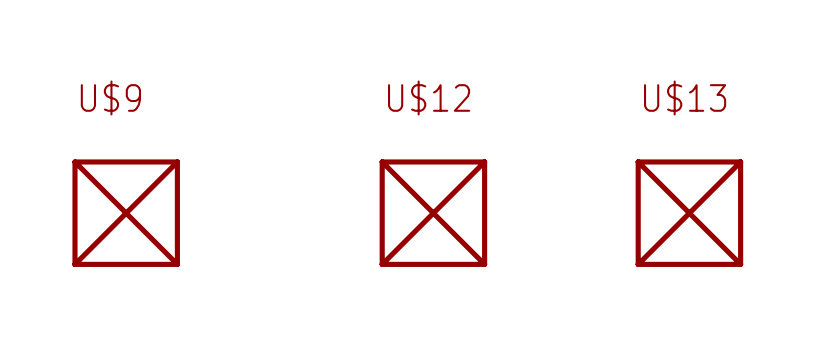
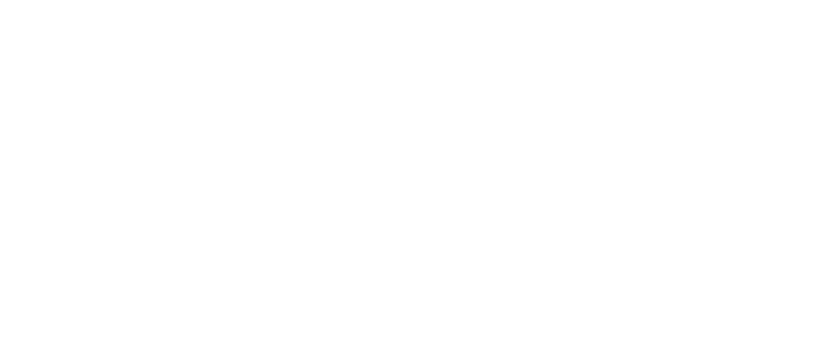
U$9: (126, 213) -> none
U$12: (433, 213) -> none
U$13: (689, 213) -> none

